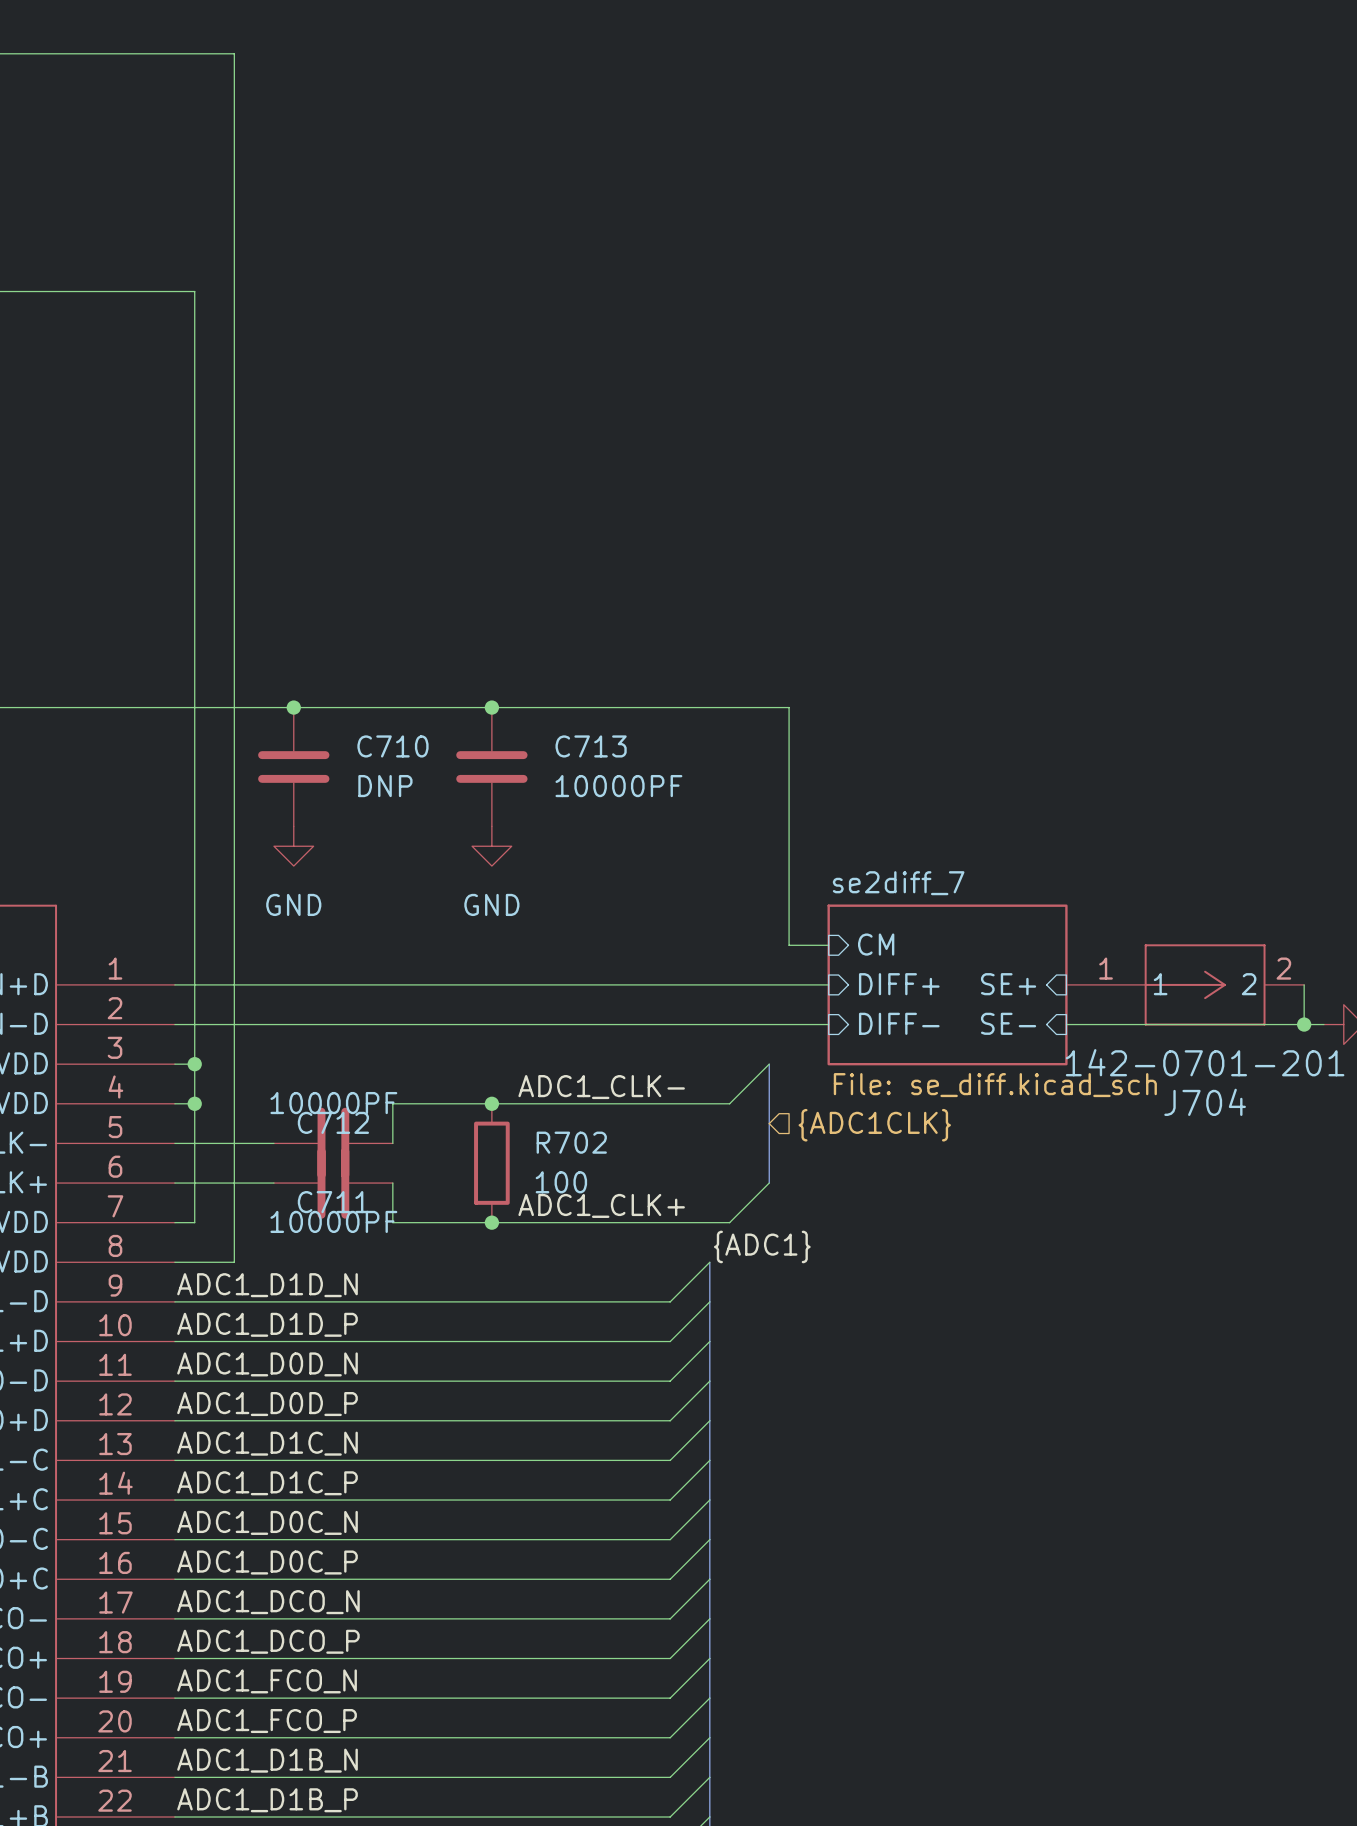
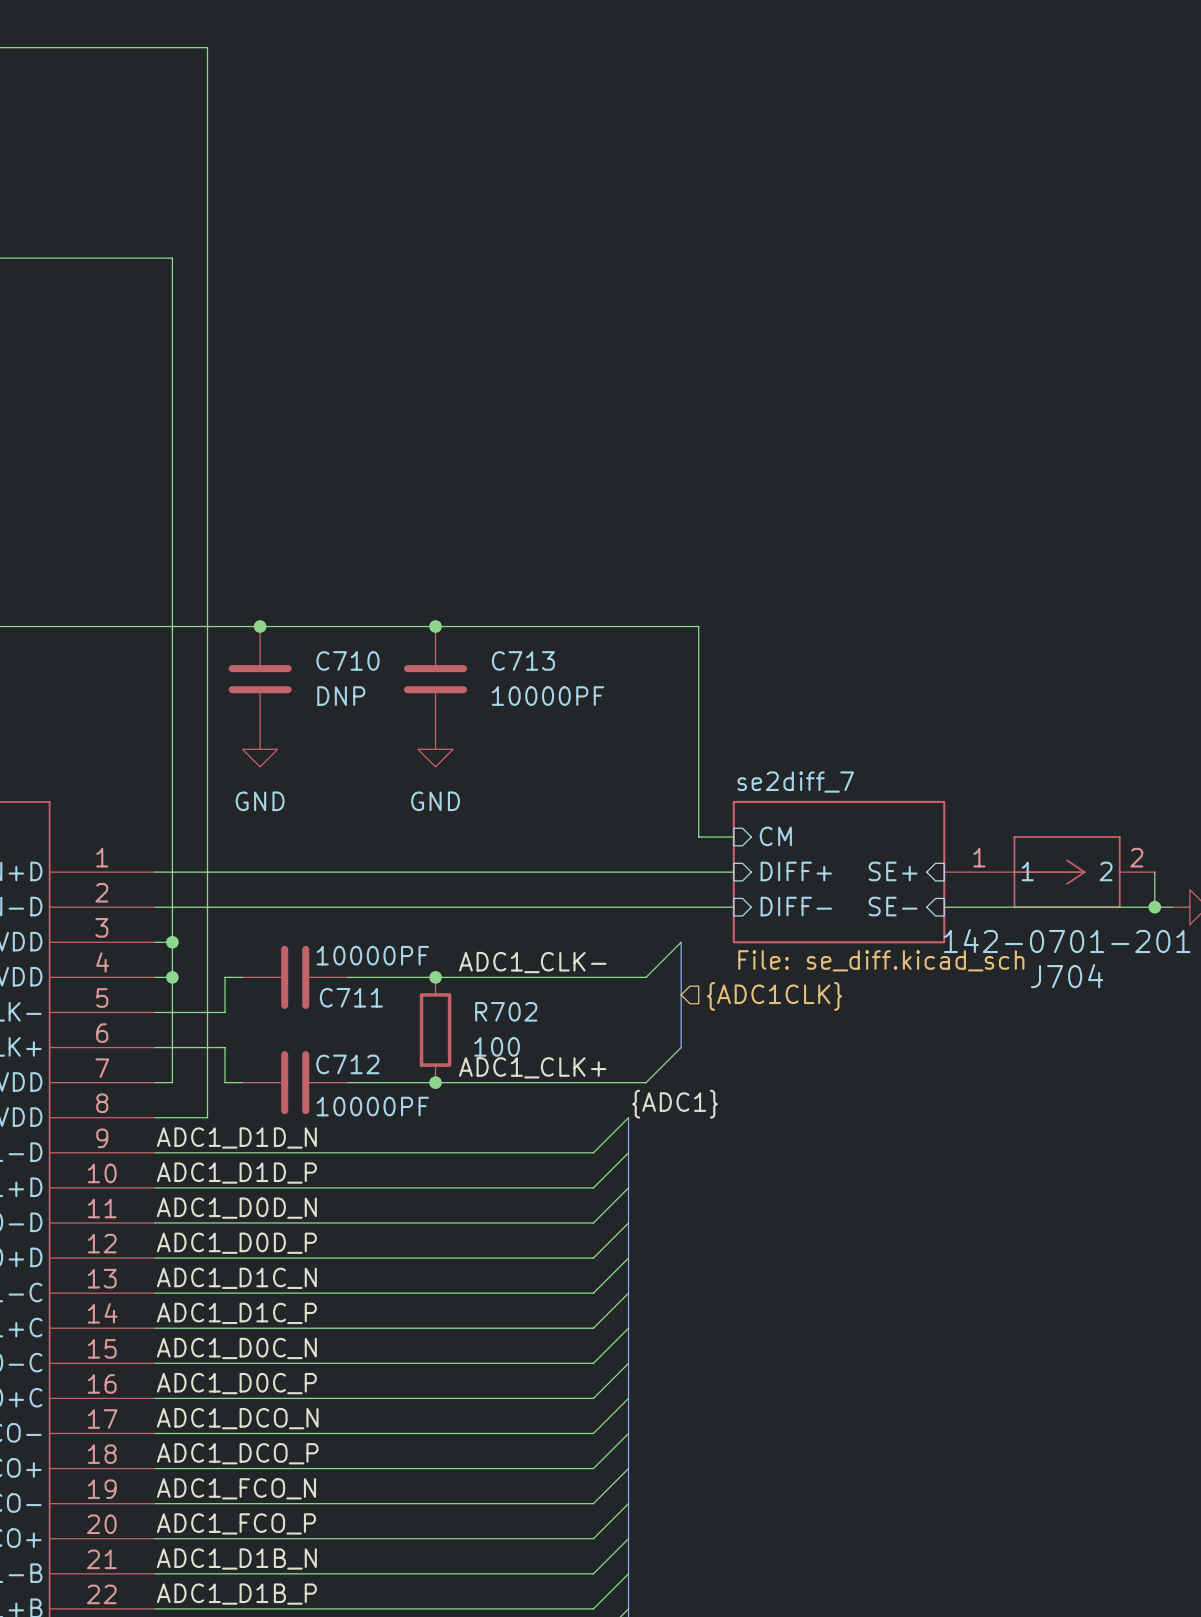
C712 value position: 10000PF (333, 1103) -> 10000PF (372, 1106)
wire: (392, 1103) (392, 1143) -> none
C712 name position: C712 (333, 1122) -> C712 (347, 1064)
wire: (254, 1143) (273, 1143) -> (225, 1012) (225, 977) (242, 977)
C711 position: (333, 1143) -> (295, 977)
wire: (254, 1183) (273, 1183) -> (225, 1047) (225, 1082) (242, 1082)
C712 position: (333, 1183) -> (295, 1082)
wire: (392, 1183) (392, 1222) -> none
C711 name position: C711 (333, 1202) -> C711 (351, 997)
C711 value position: 10000PF (333, 1221) -> 10000PF (372, 955)

